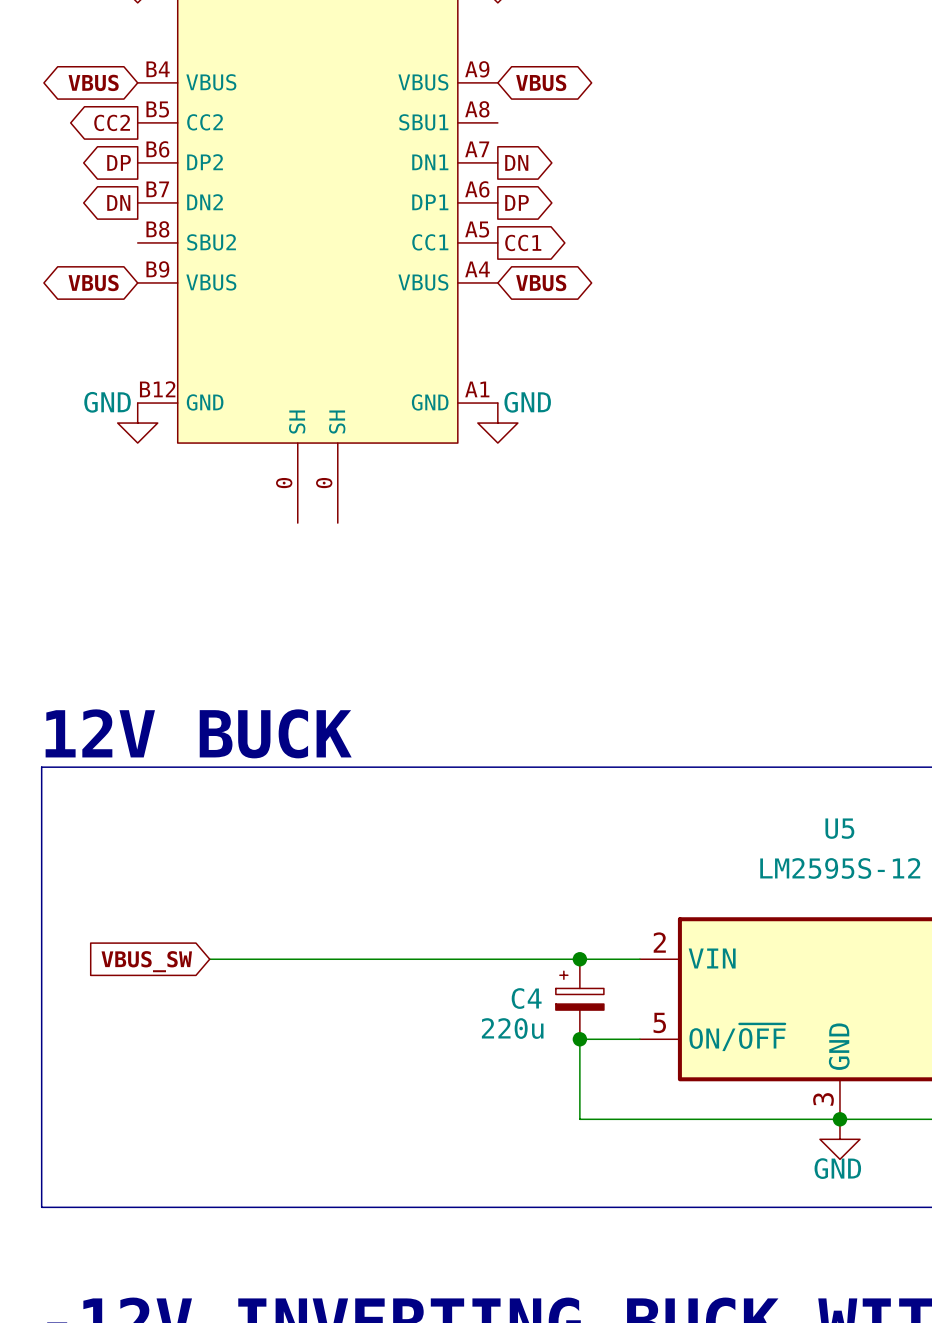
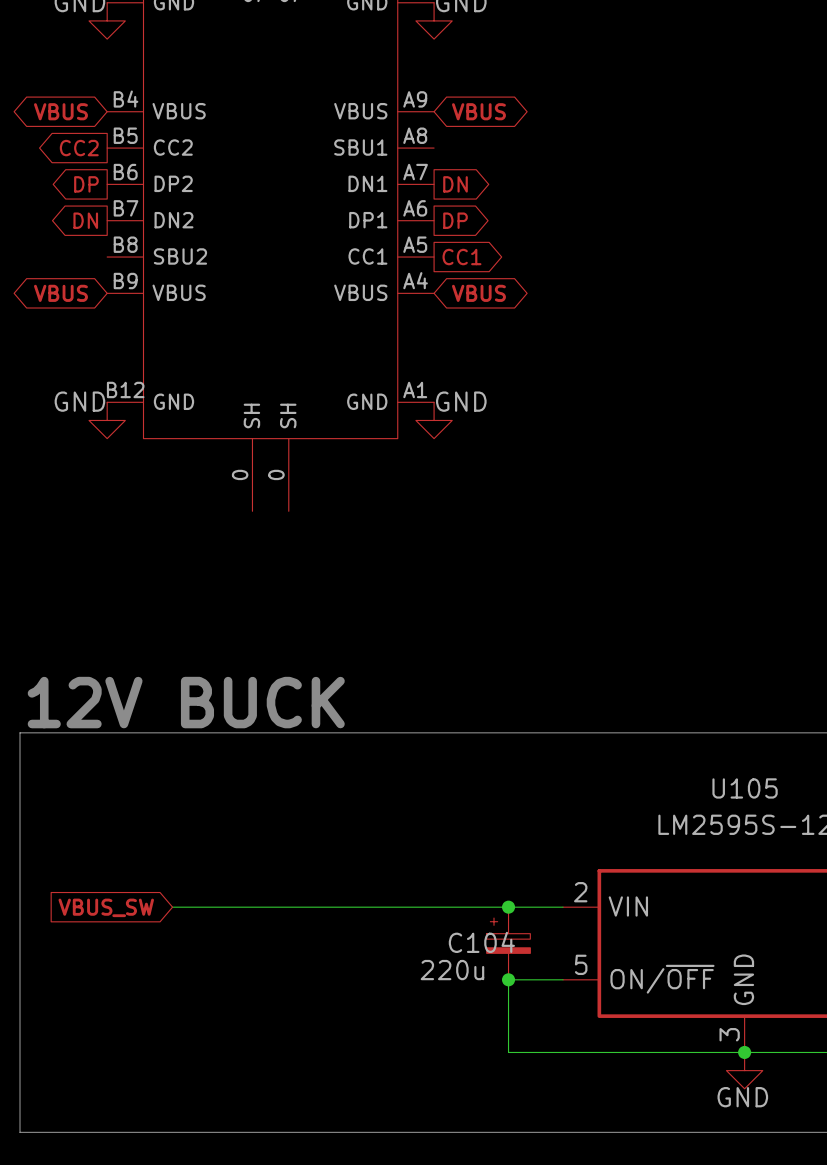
U5 name: U5 (839, 828) -> U105 (745, 788)
C4 name: C4 (526, 998) -> C104 (481, 942)

